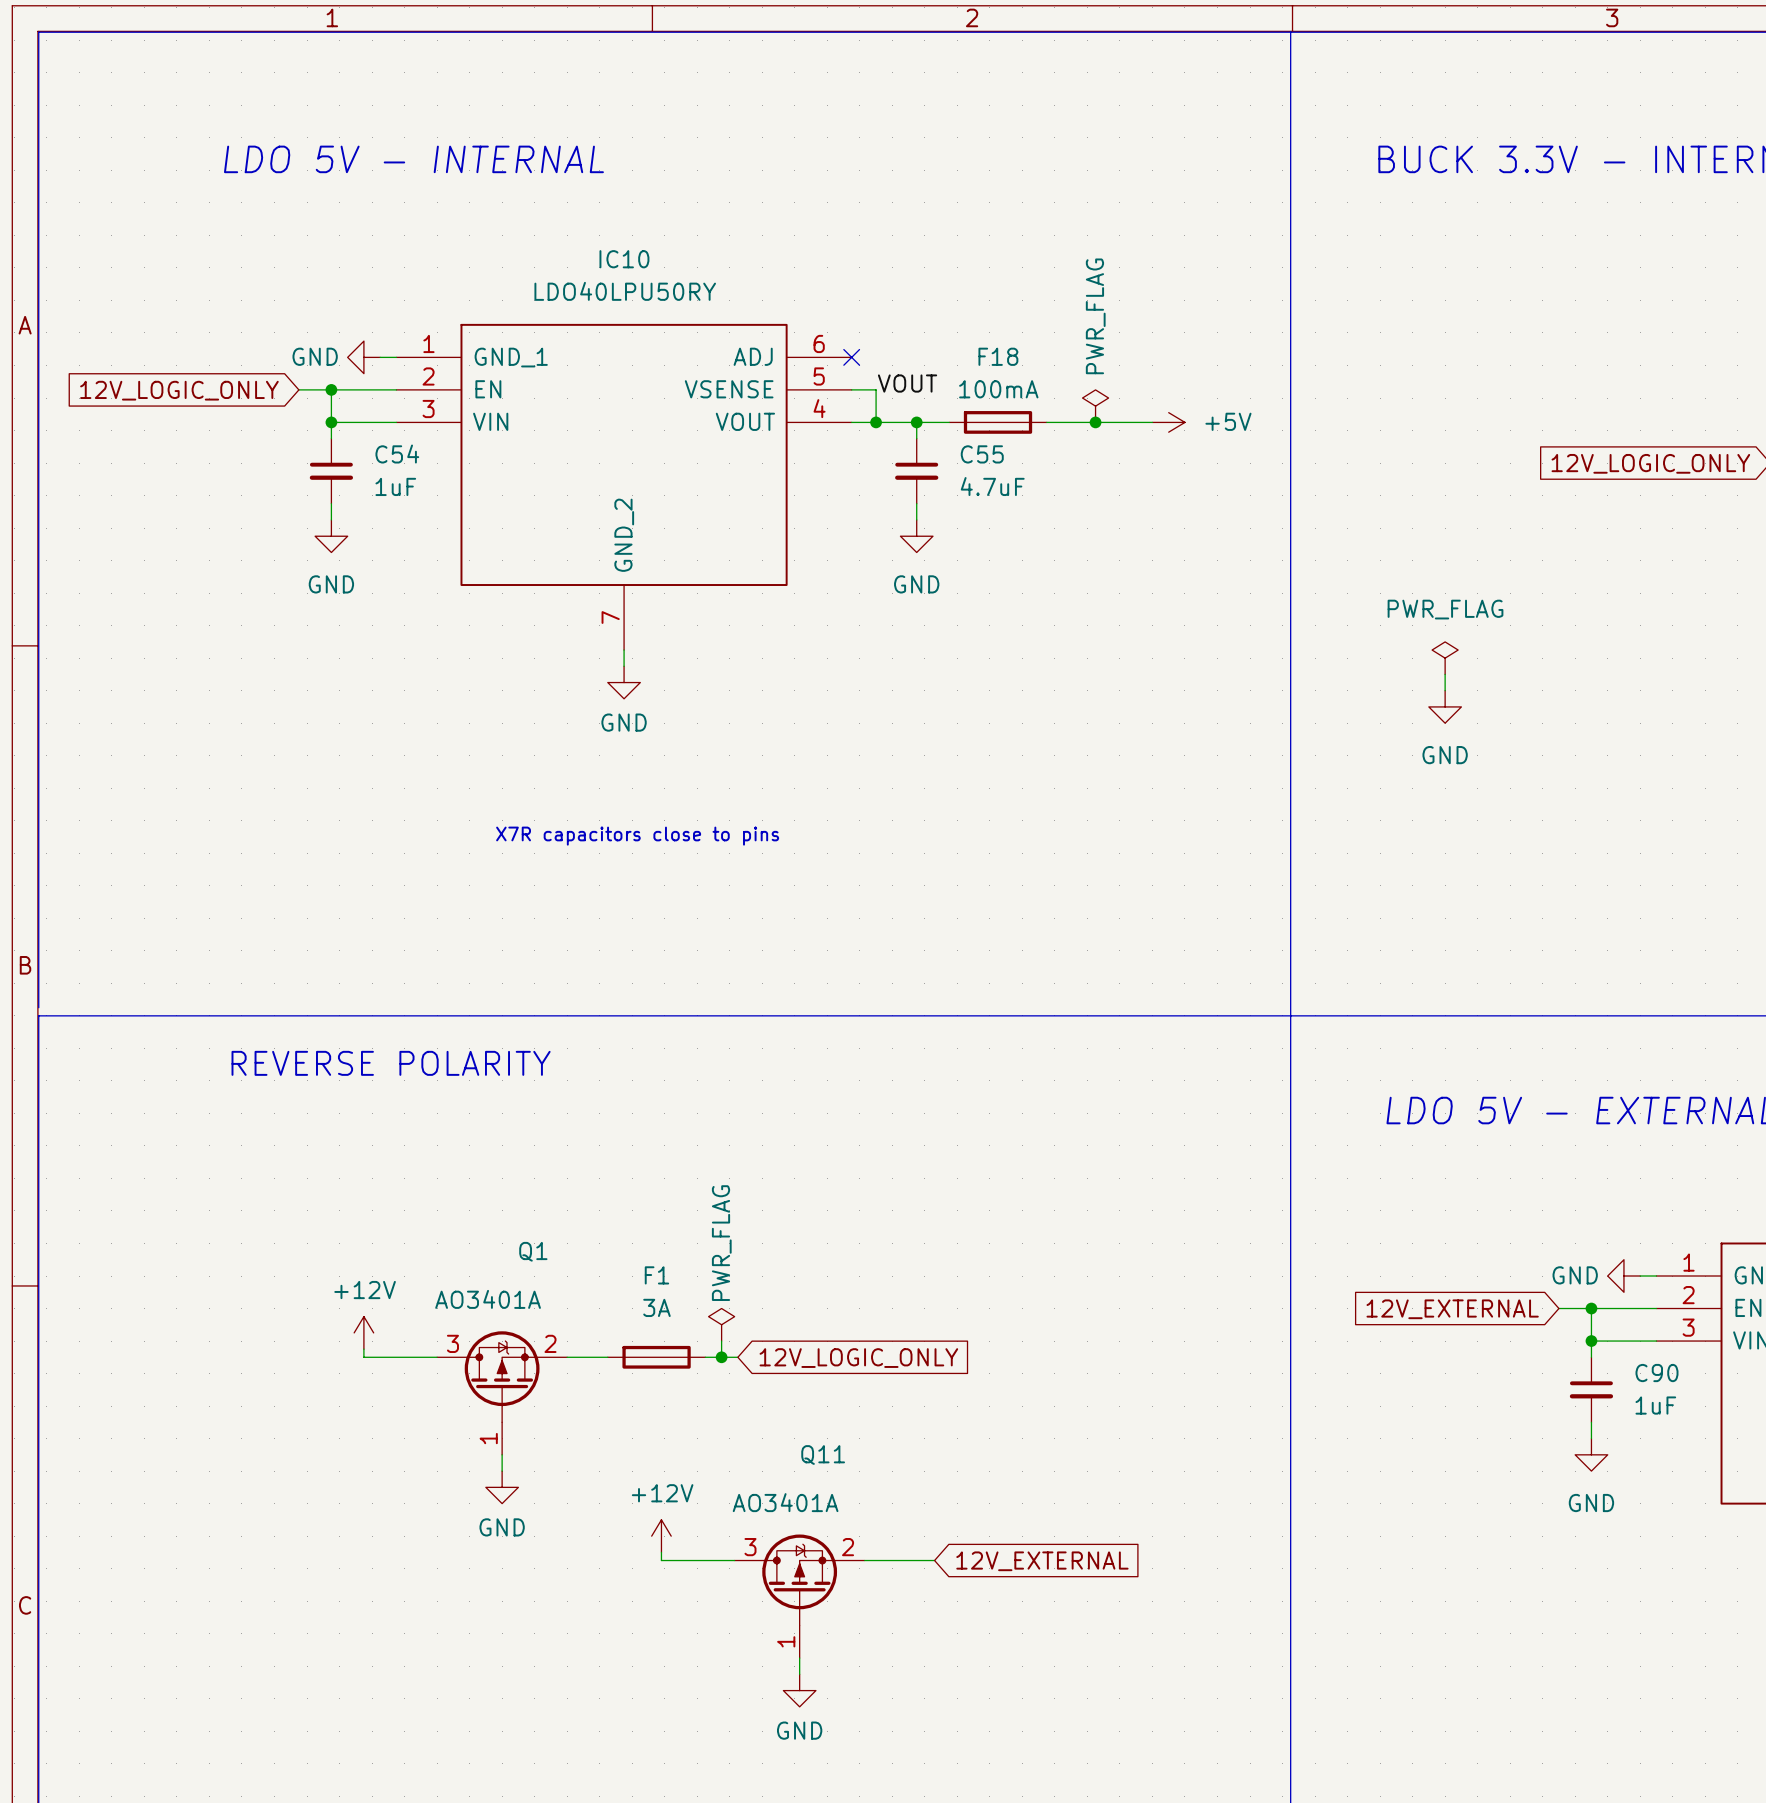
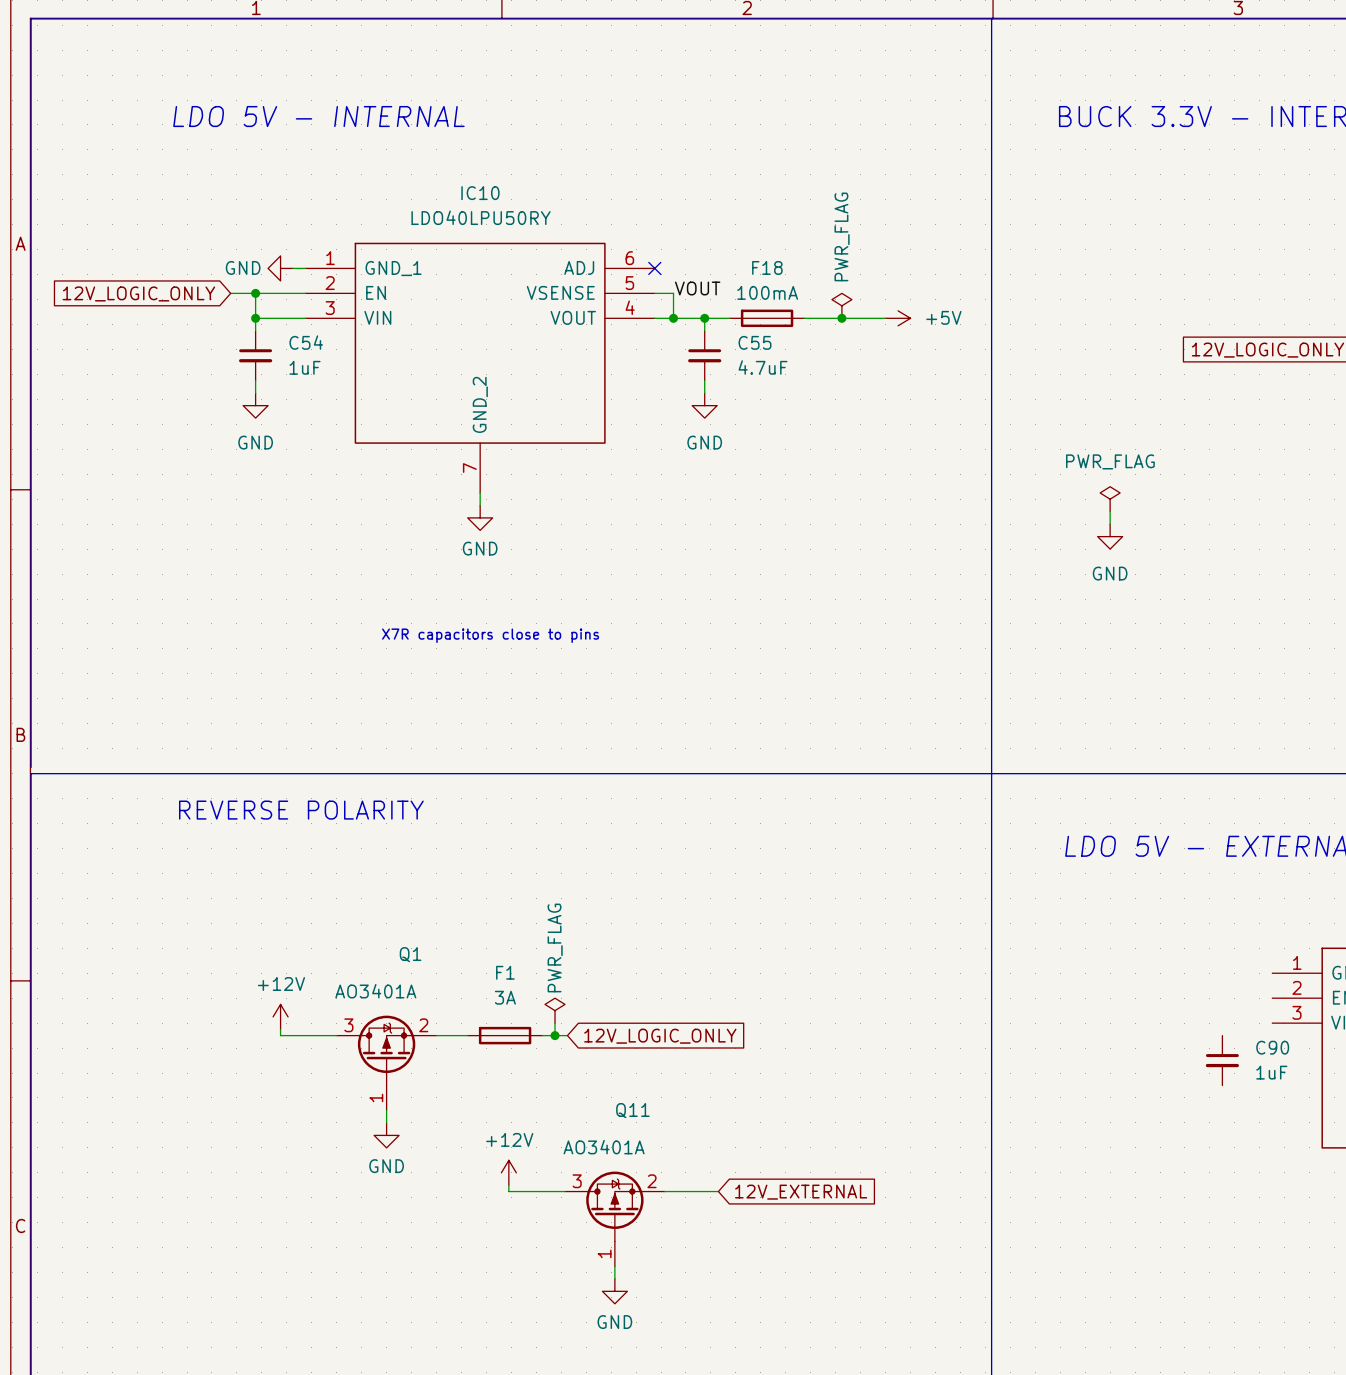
power symbol: GND (1623, 1276) -> none
wire: (1640, 1276) (1656, 1276) -> none
wire: (1558, 1308) (1656, 1308) -> none
wire: (1591, 1308) (1591, 1357) -> none
junction: (1591, 1308) -> none
global label: 12V_EXTERNAL (1452, 1309) -> none
wire: (1591, 1341) (1656, 1341) -> none
junction: (1591, 1341) -> none
wire: (1591, 1422) (1591, 1438) -> none
power symbol: GND (1591, 1454) -> none

